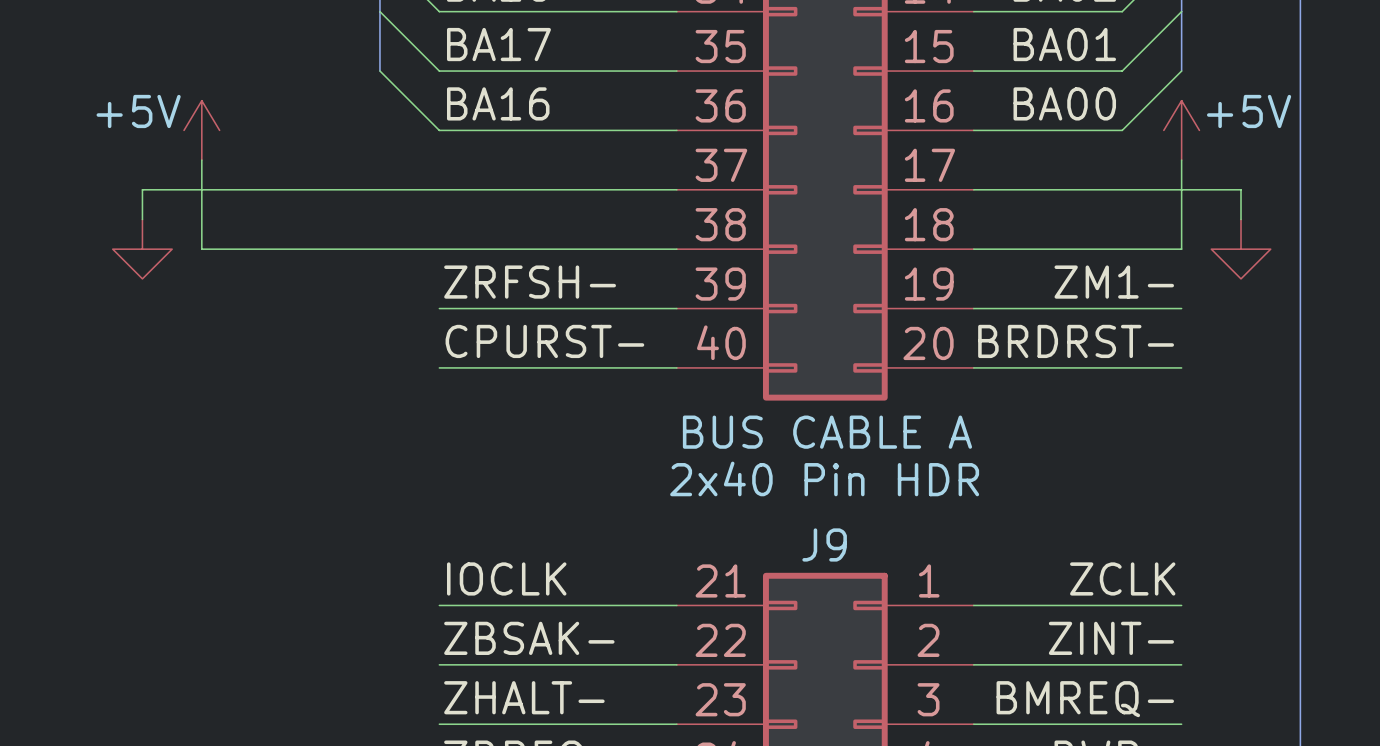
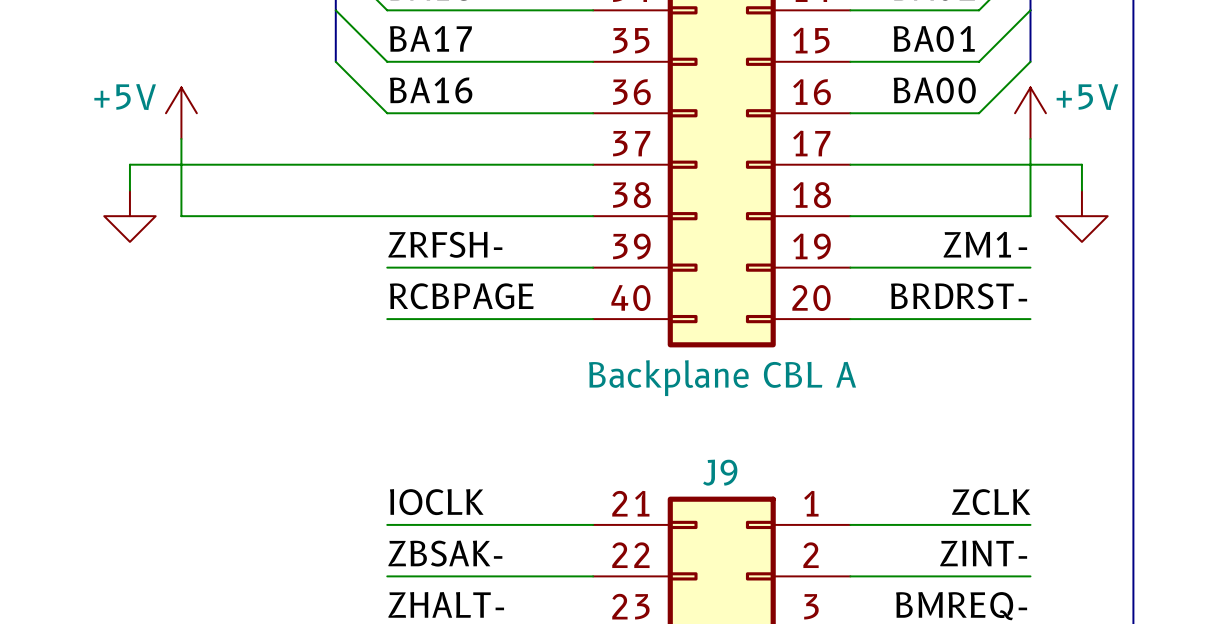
label: CPURST- (544, 341) -> RCBPAGE (461, 296)
part text: BUS CABLE A (827, 432) -> Backplane CBL A (722, 378)
part text: 2x40 Pin HDR (824, 478) -> none

